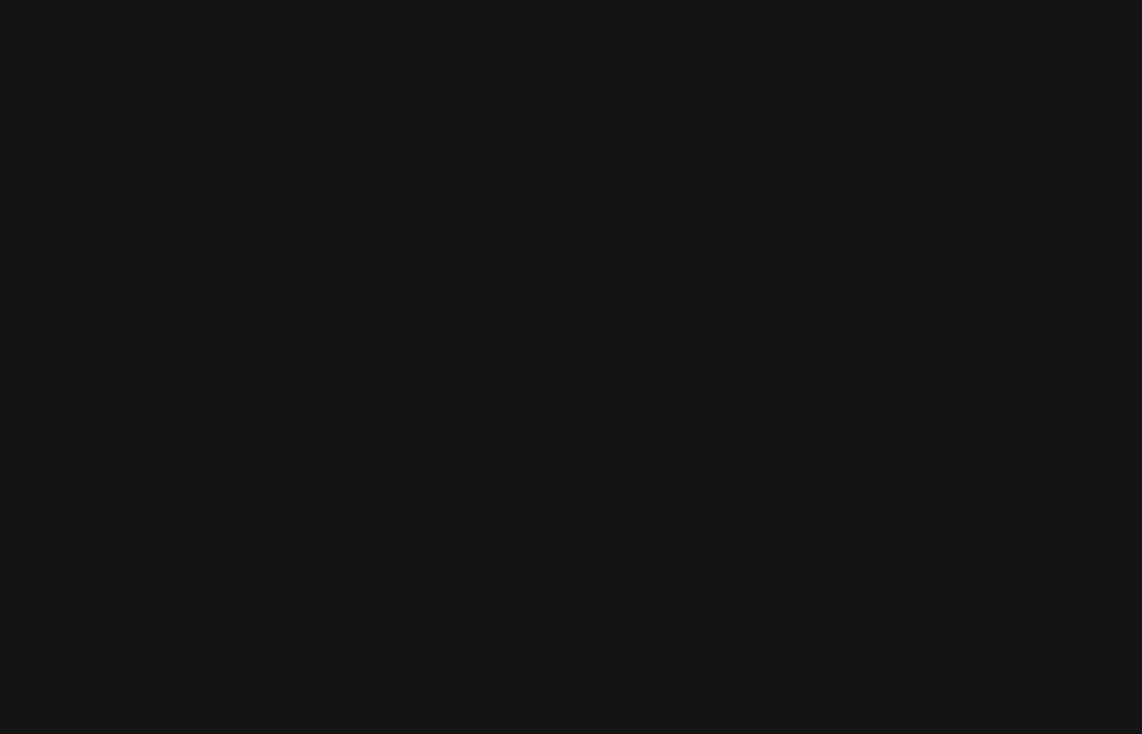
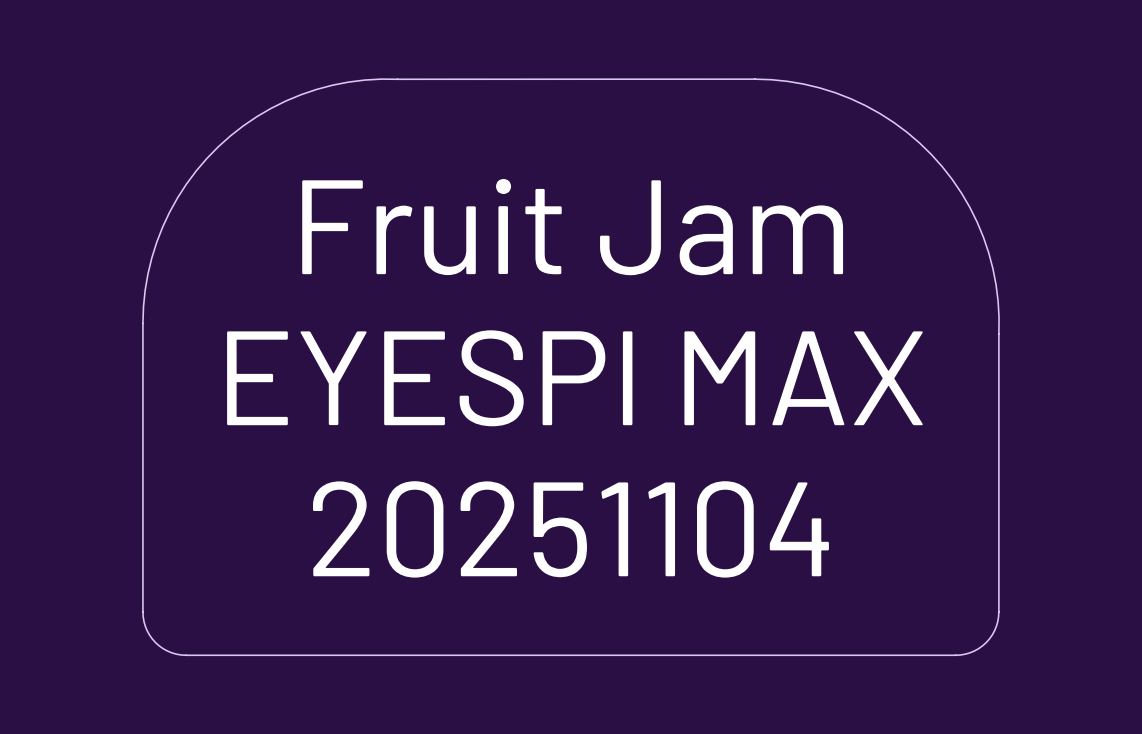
text: none -> Fruit Jam (572, 227)
board edge: none -> (142, 322) (147, 274) (156, 242) (177, 197) (196, 171) (230, 135) (257, 116) (285, 101) (316, 89) (348, 82) (381, 79) (754, 79) (787, 81) (835, 92) (880, 113) (907, 132) (931, 154) (961, 193) (977, 222) (988, 252) (996, 284) (999, 317) (998, 612) (996, 626) (989, 639) (978, 648) (969, 652) (955, 655) (186, 655) (171, 652) (159, 645) (152, 639) (145, 626) (143, 616) (142, 323)
text: none -> EYESPI MAX (574, 378)
text: none -> 20251104 (570, 529)

